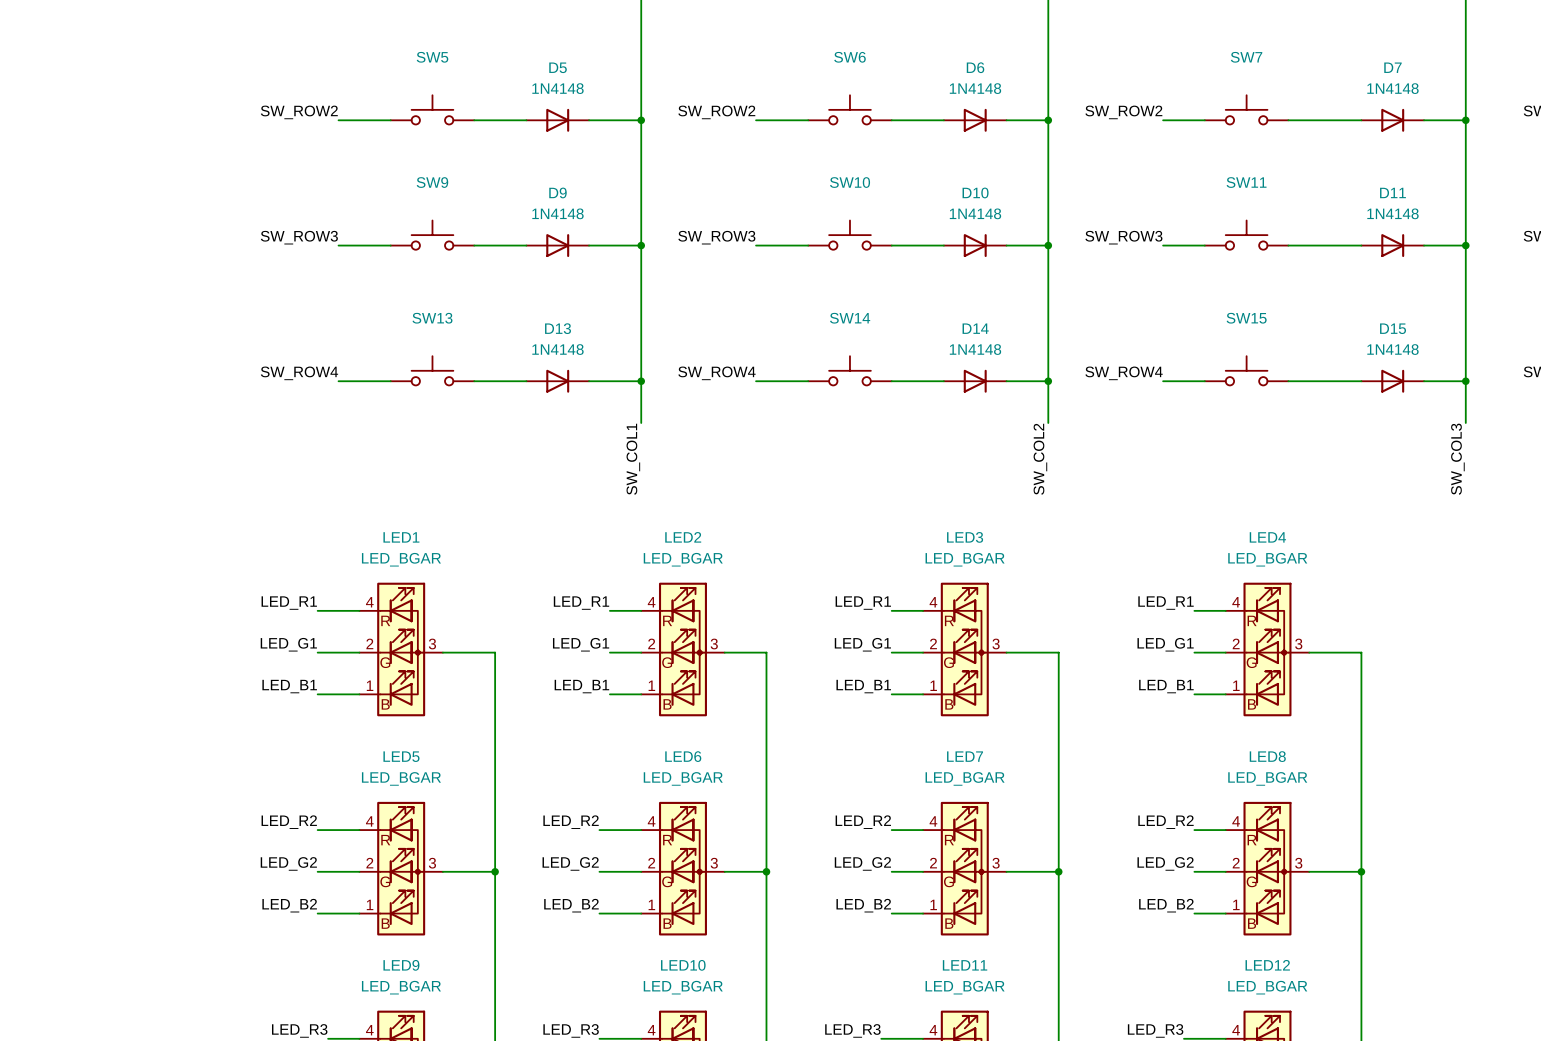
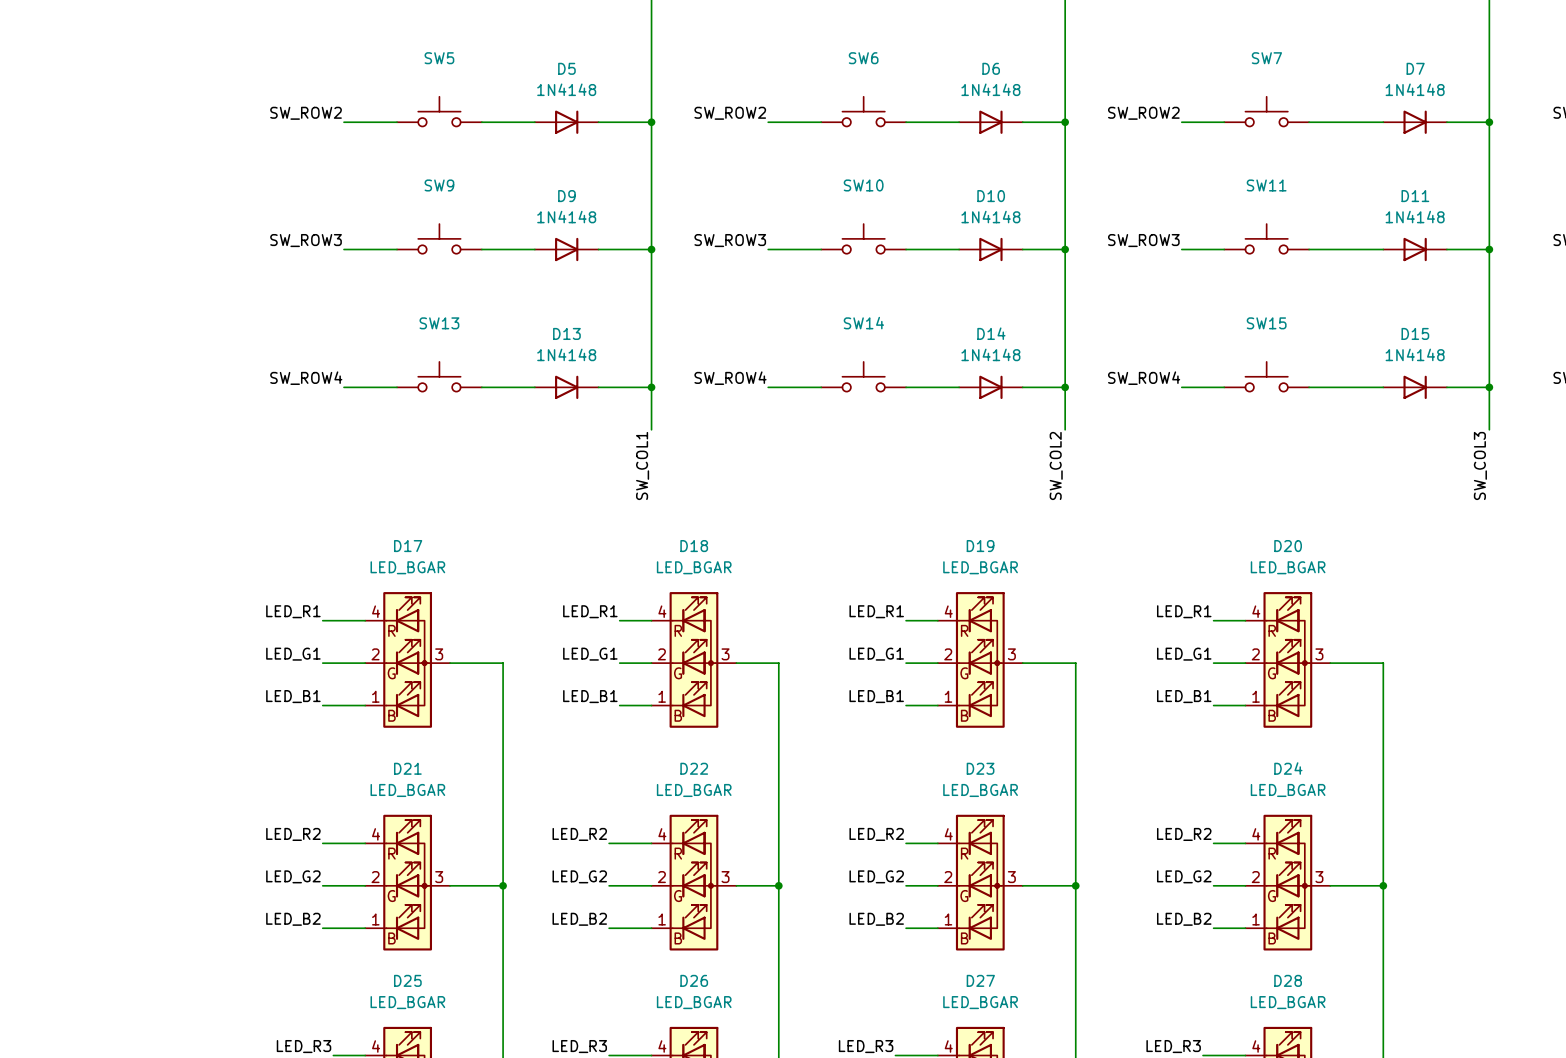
LED1 name: LED1 (401, 537) -> D17 (408, 546)
LED2 name: LED2 (683, 537) -> D18 (694, 546)
LED3 name: LED3 (965, 537) -> D19 (980, 546)
LED4 name: LED4 (1267, 537) -> D20 (1288, 546)
LED5 name: LED5 (401, 756) -> D21 (407, 768)
LED6 name: LED6 (683, 756) -> D22 (694, 768)
LED7 name: LED7 (965, 756) -> D23 (980, 768)
LED8 name: LED8 (1267, 756) -> D24 (1288, 768)
LED9 name: LED9 (401, 965) -> D25 (407, 980)
LED10 name: LED10 (683, 965) -> D26 (694, 980)
LED11 name: LED11 (965, 965) -> D27 (980, 980)
LED12 name: LED12 (1267, 965) -> D28 (1288, 980)

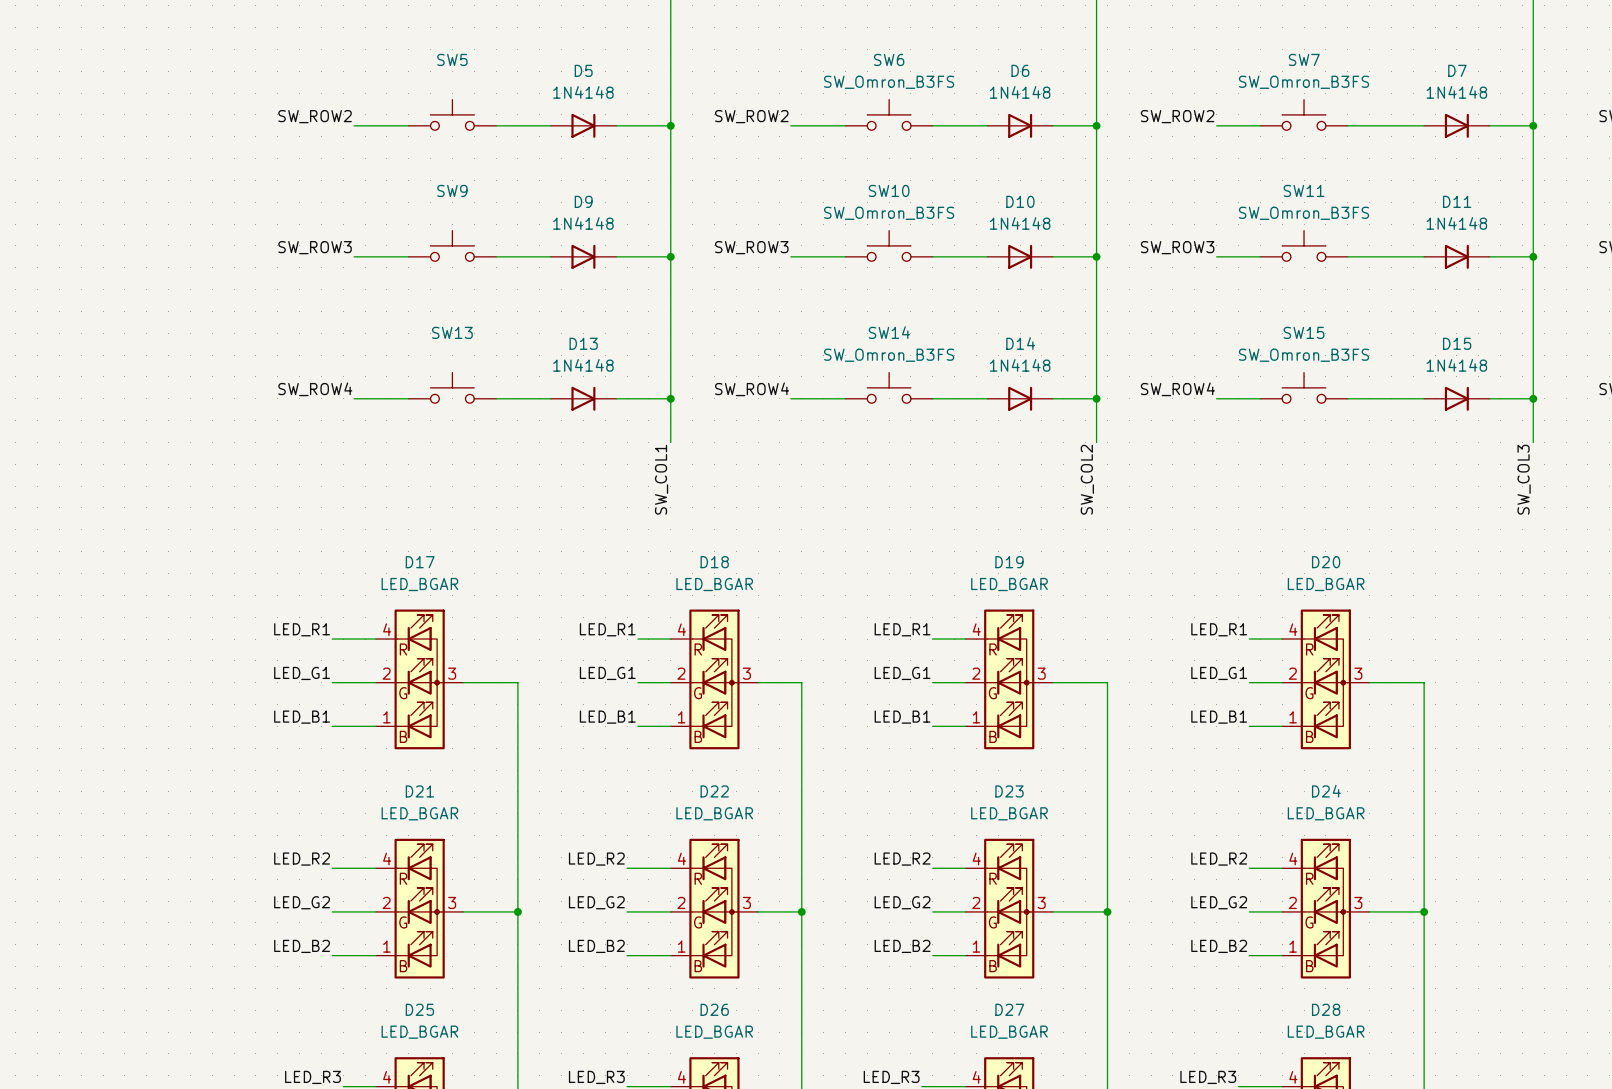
SW6 value: none -> SW_Omron_B3FS (889, 82)
SW7 value: none -> SW_Omron_B3FS (1304, 82)
SW10 value: none -> SW_Omron_B3FS (889, 213)
SW11 value: none -> SW_Omron_B3FS (1304, 213)
SW14 value: none -> SW_Omron_B3FS (889, 355)
SW15 value: none -> SW_Omron_B3FS (1304, 355)

